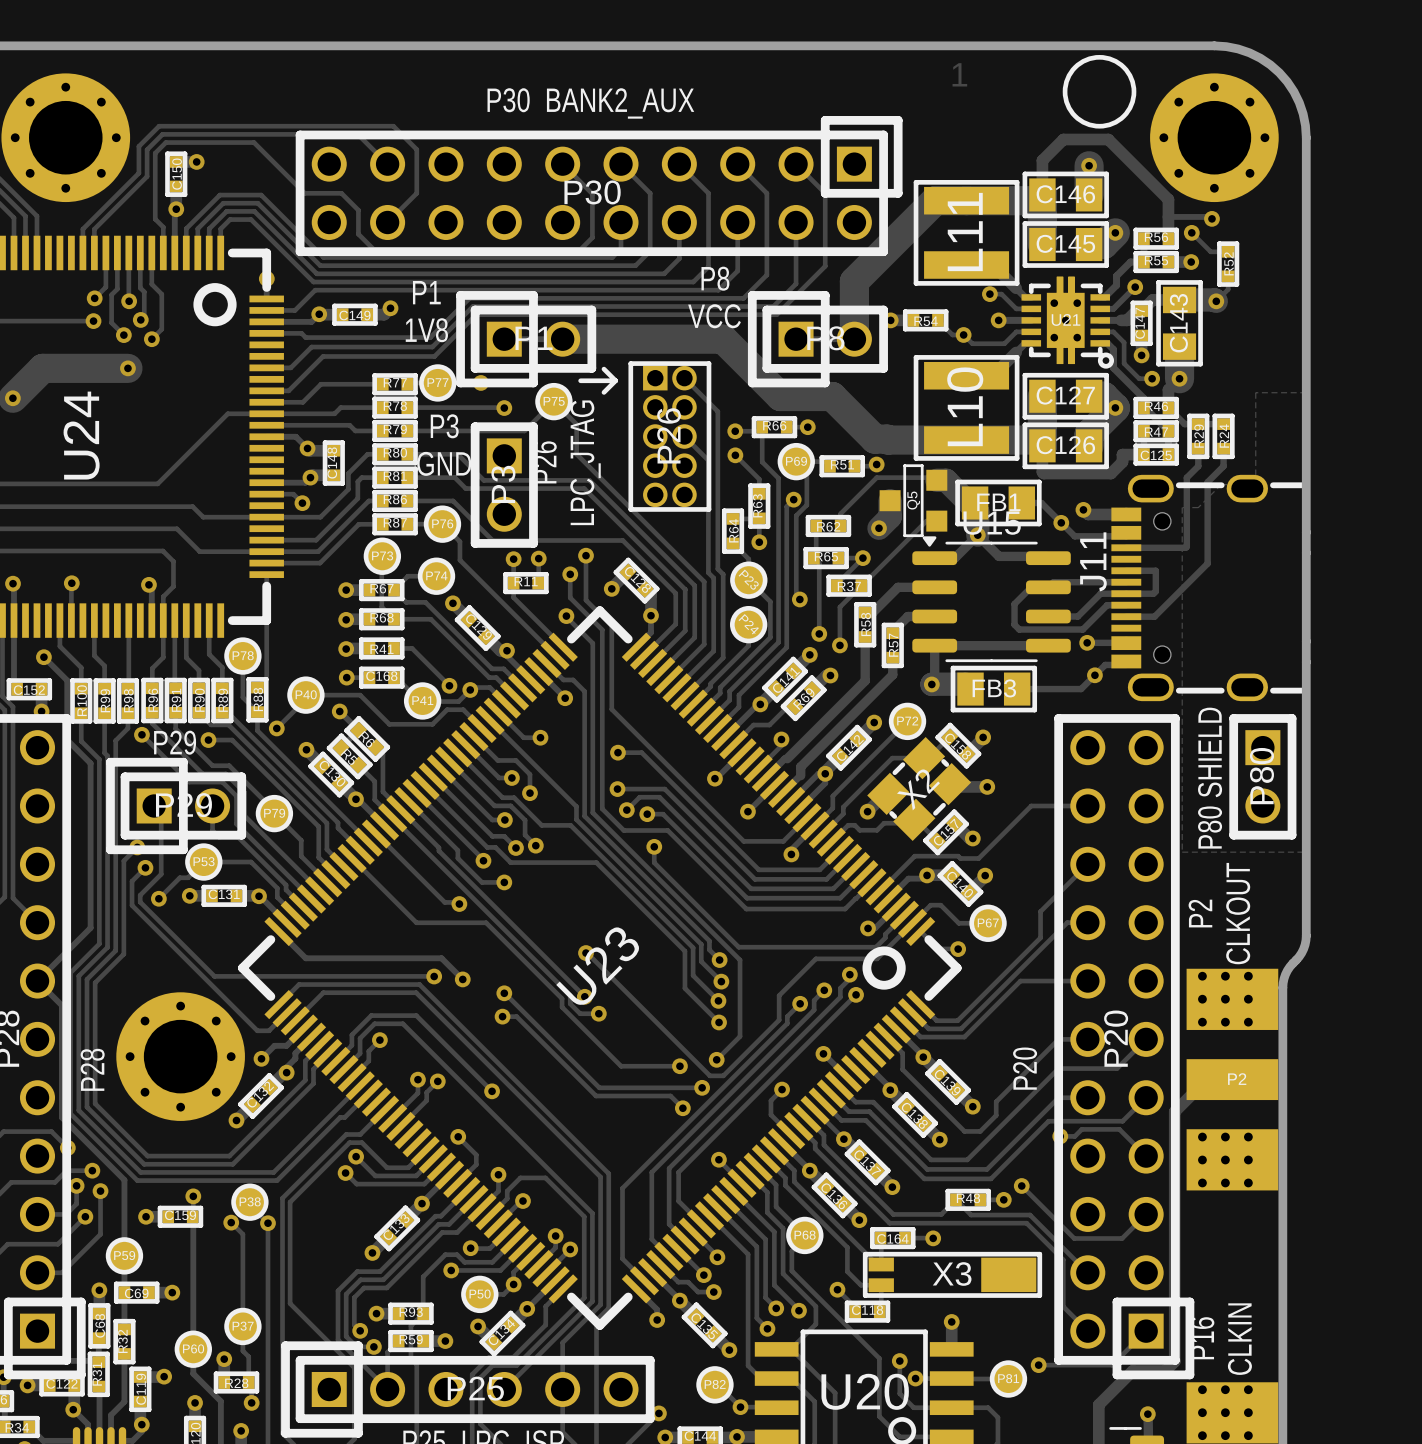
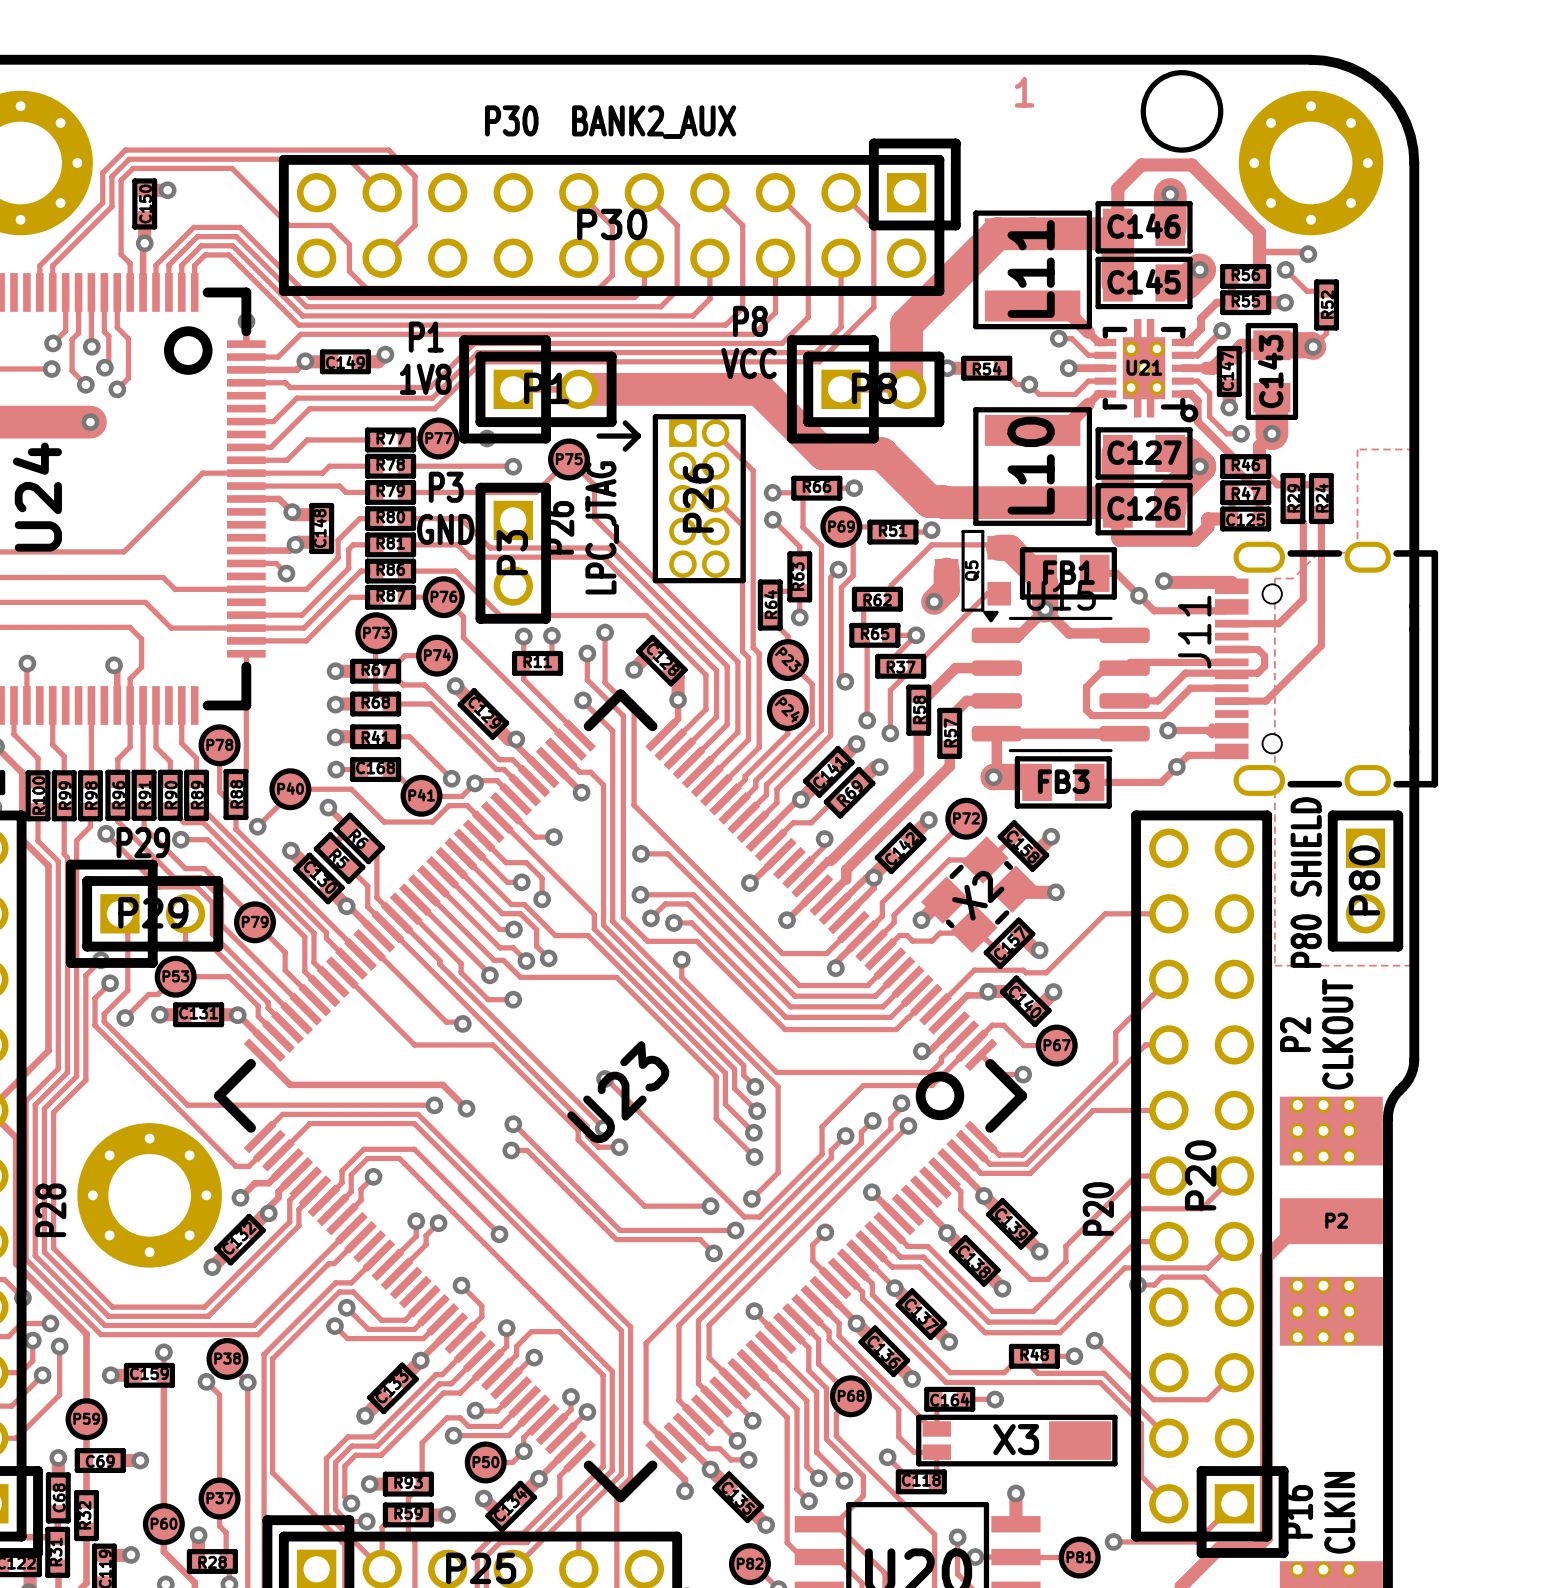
track: (1198, 448) (1198, 466) (1186, 477) (1186, 546) -> (1292, 512) (1303, 522) (1303, 599) (1280, 622)
track: (1223, 466) (1207, 482) (1207, 563) (1154, 616) -> (1321, 532) (1321, 645) (1265, 701) (1243, 701)
track: (1084, 511) (1088, 514) (1122, 514) (1126, 511) -> (1165, 582) (1231, 582)
track: (1155, 570) (1155, 591) (1153, 593) (1100, 593) -> (1245, 649) (1258, 649) (1264, 655) (1264, 666) (1257, 673) (1185, 673) (1183, 675)
J11 position: (1210, 587) -> (1326, 668)

